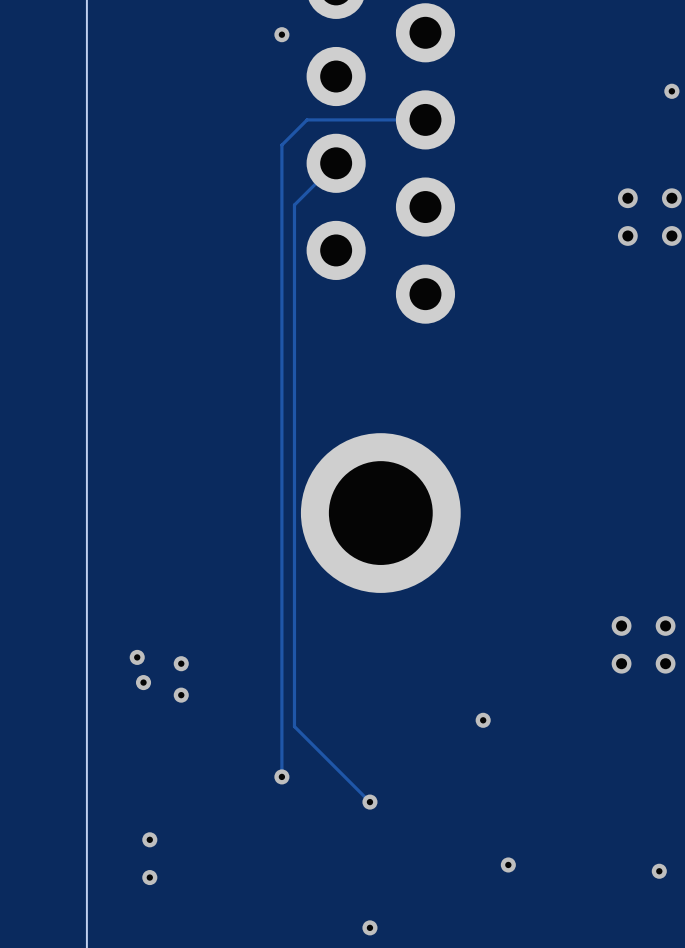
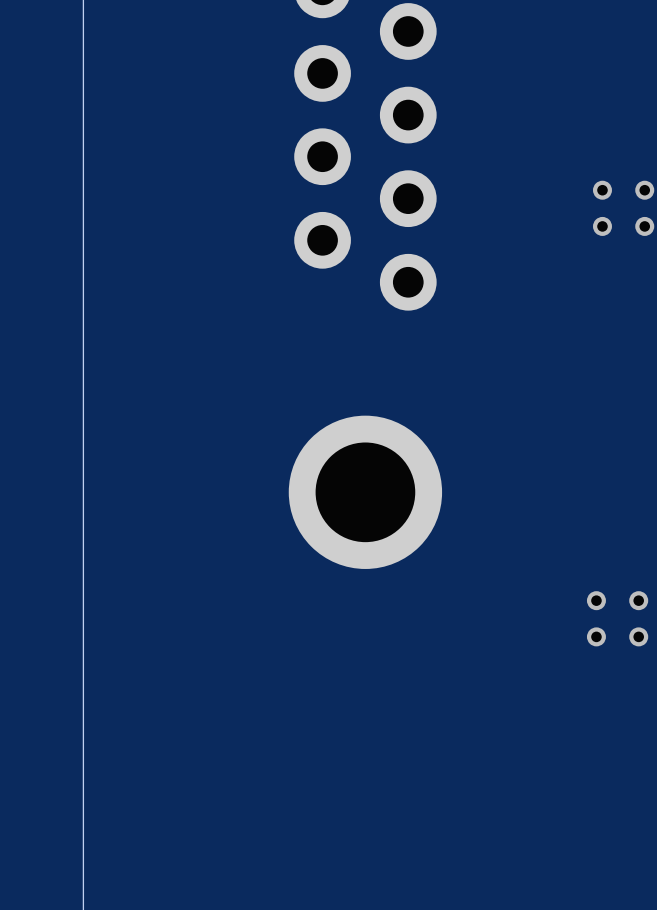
via: (281, 34) -> none
via: (671, 91) -> none
track: (425, 119) (307, 119) (281, 145) (281, 776) -> none
track: (336, 163) (294, 204) (294, 726) (369, 802) -> none
via: (137, 657) -> none
via: (181, 663) -> none
via: (143, 682) -> none
via: (181, 695) -> none
via: (483, 720) -> none
via: (281, 776) -> none
via: (369, 802) -> none
via: (149, 839) -> none
via: (508, 864) -> none
via: (659, 871) -> none
via: (149, 877) -> none
via: (369, 927) -> none

